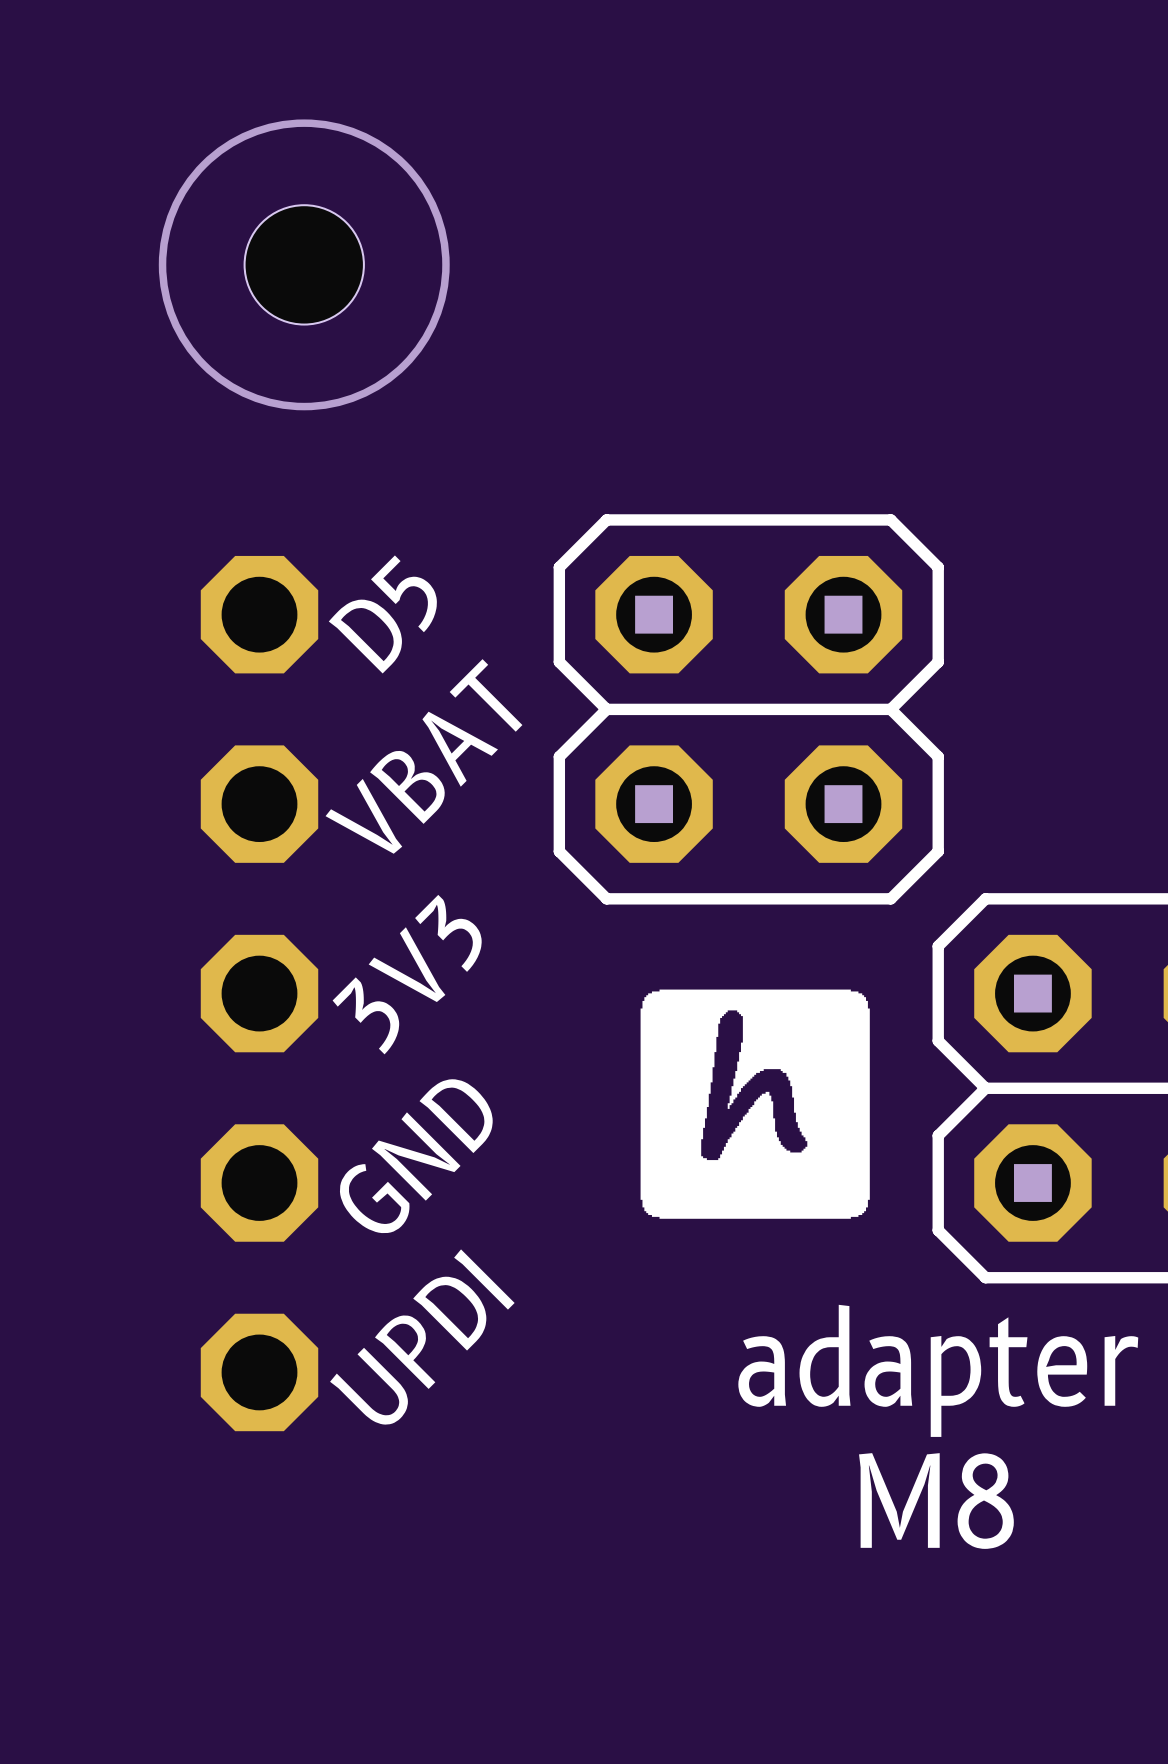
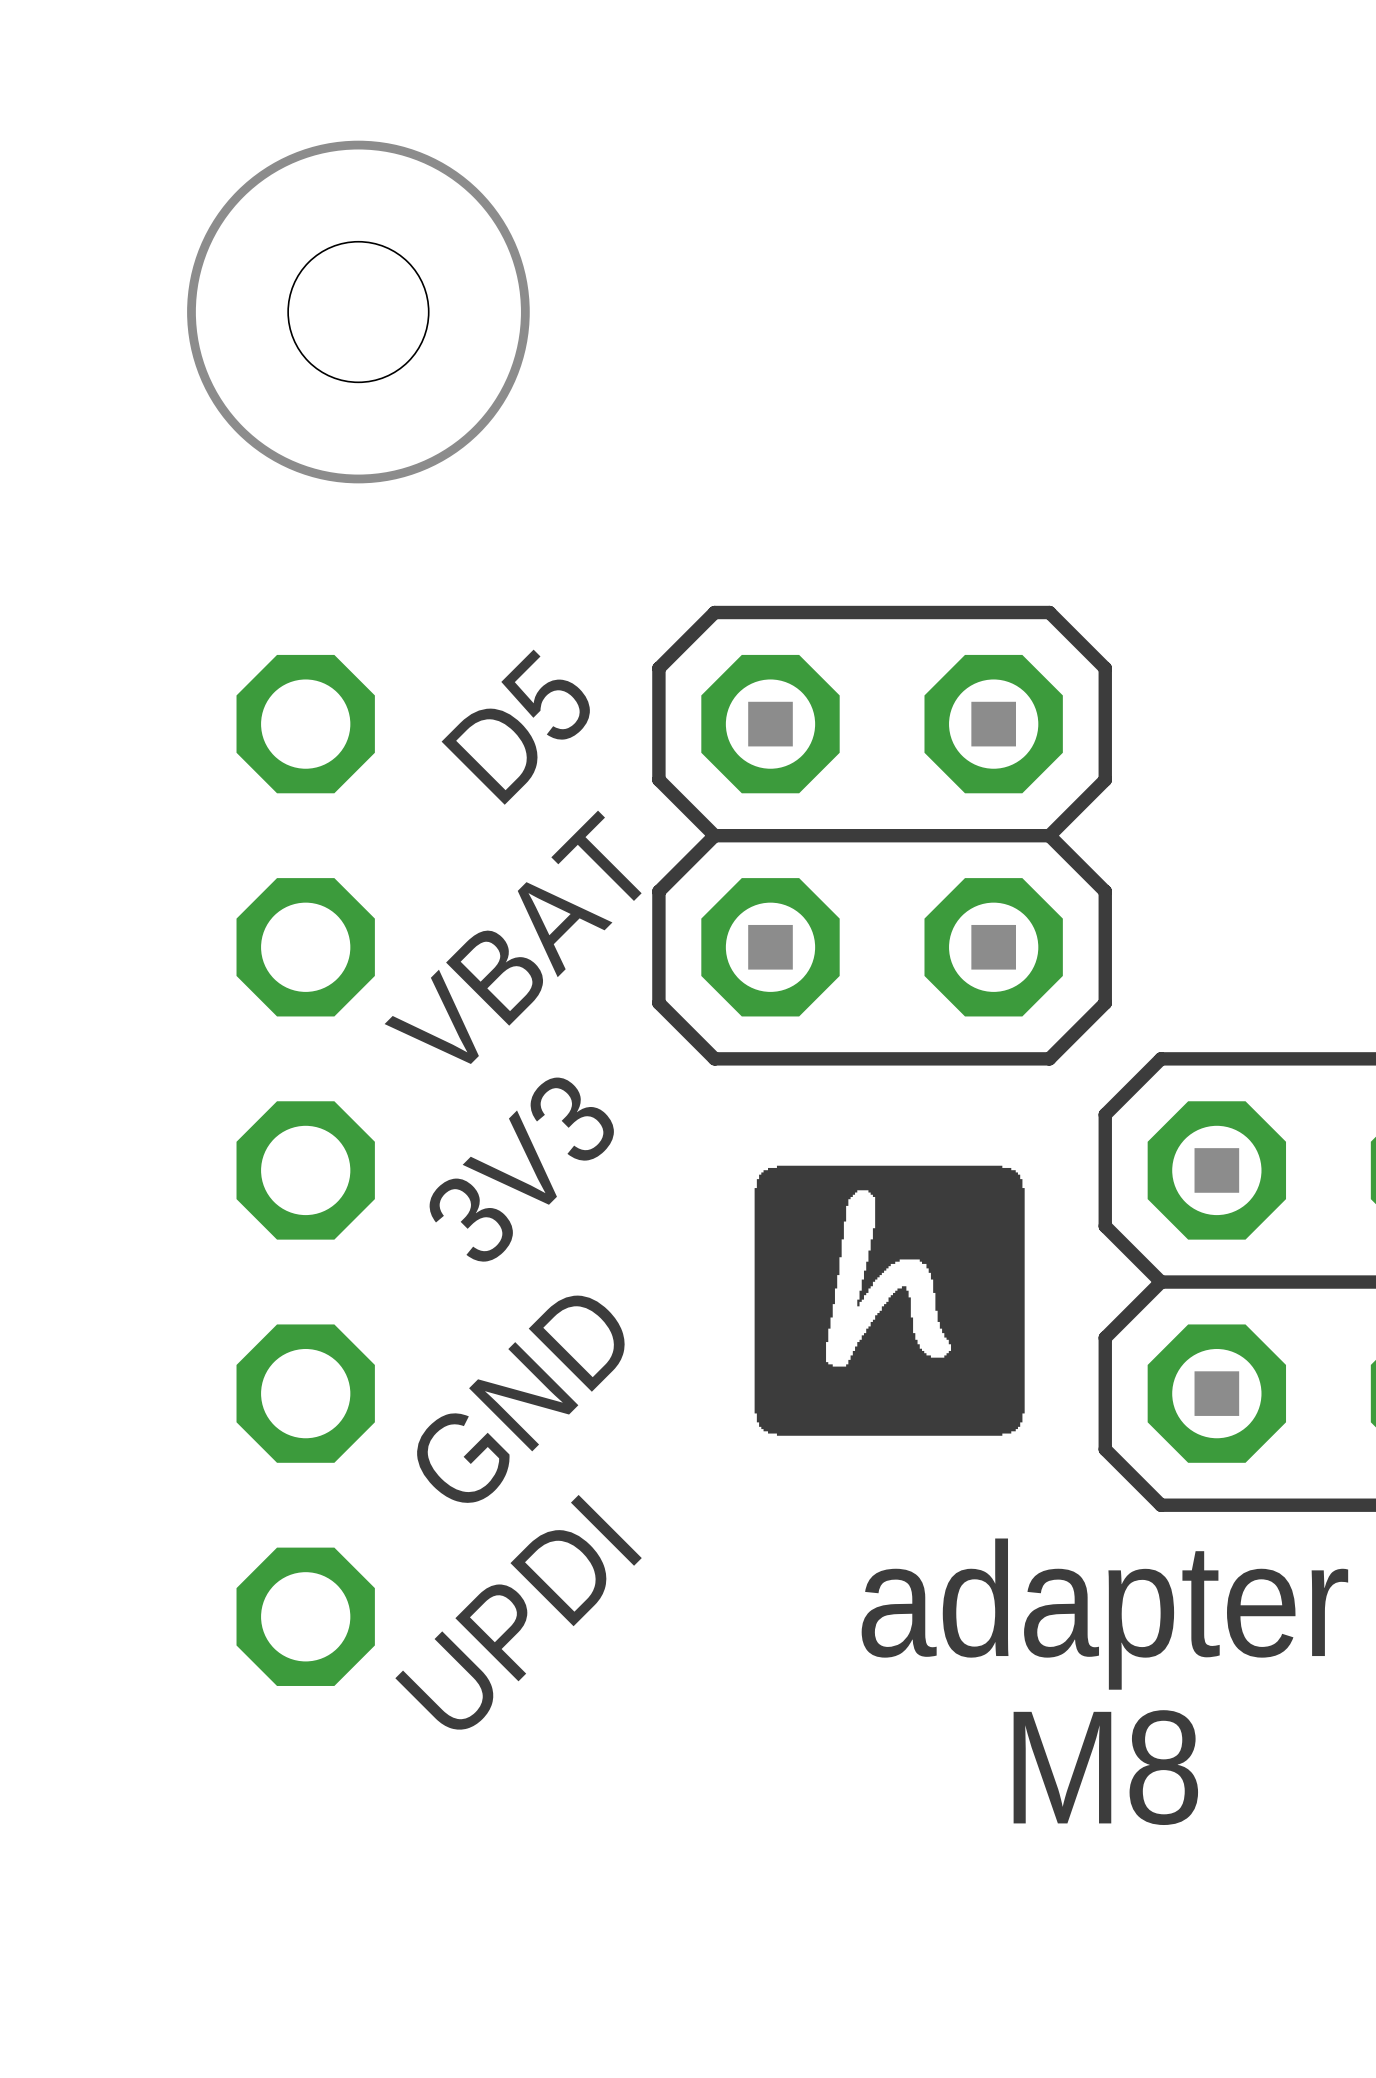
text position: D5 (382, 614) -> D5 (515, 727)
text position: VBAT (423, 756) -> VBAT (513, 937)
text position: 3V3 (407, 974) -> 3V3 (521, 1169)
text position: GND (415, 1156) -> GND (521, 1399)
text position: UPDI (422, 1337) -> UPDI (518, 1612)

